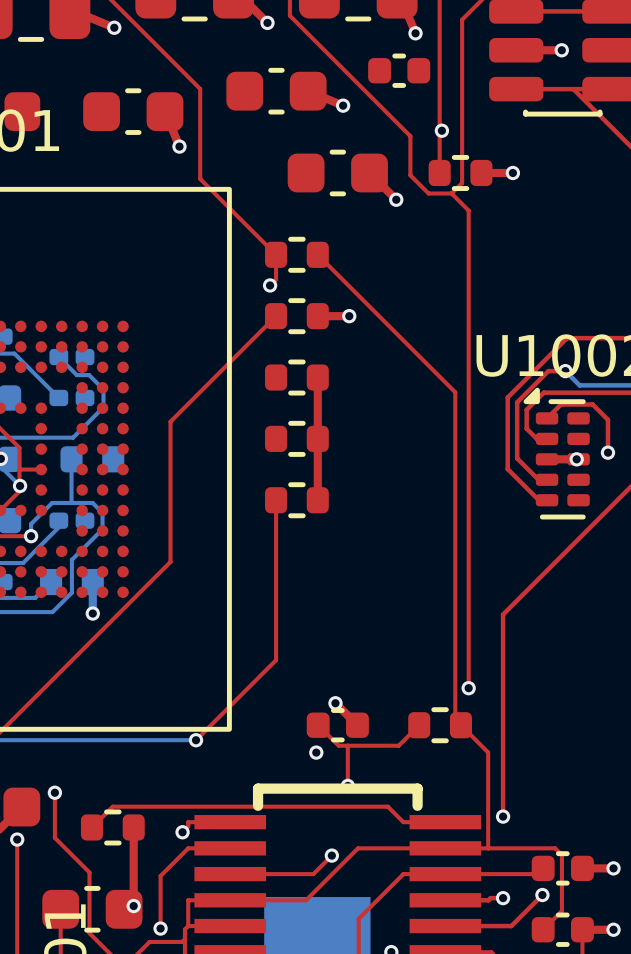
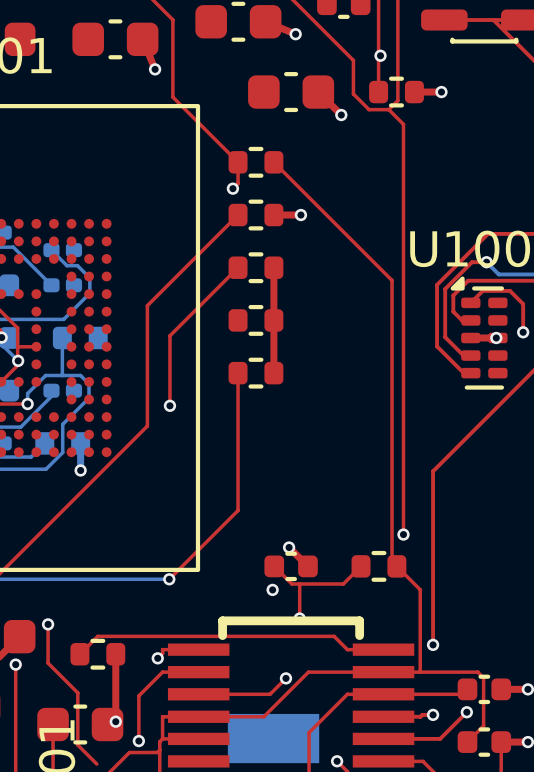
top track: none -> (238, 267) (169, 335) (169, 405)
via: none -> (169, 405)

